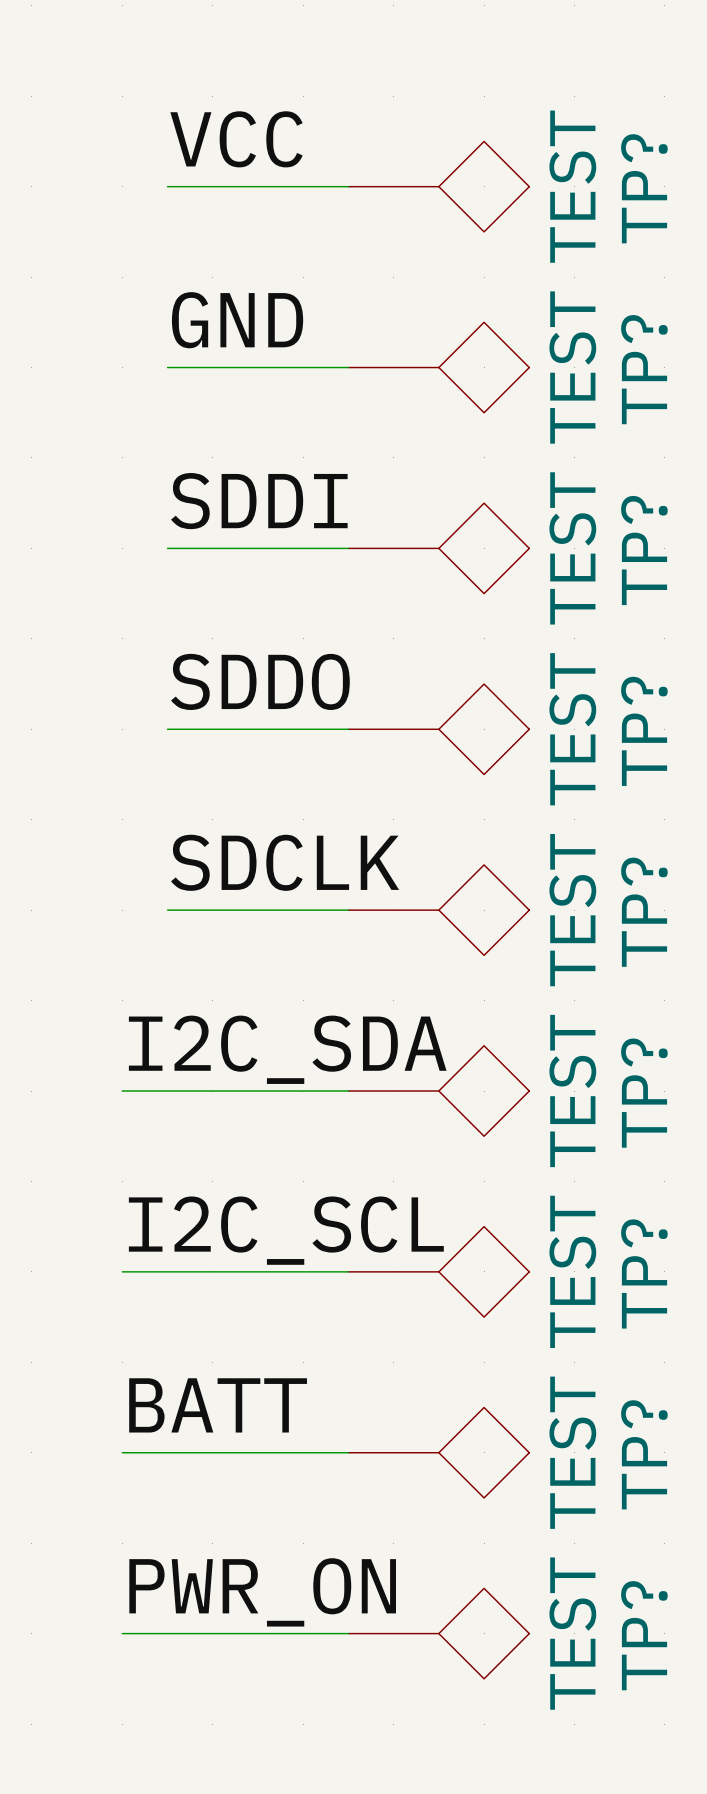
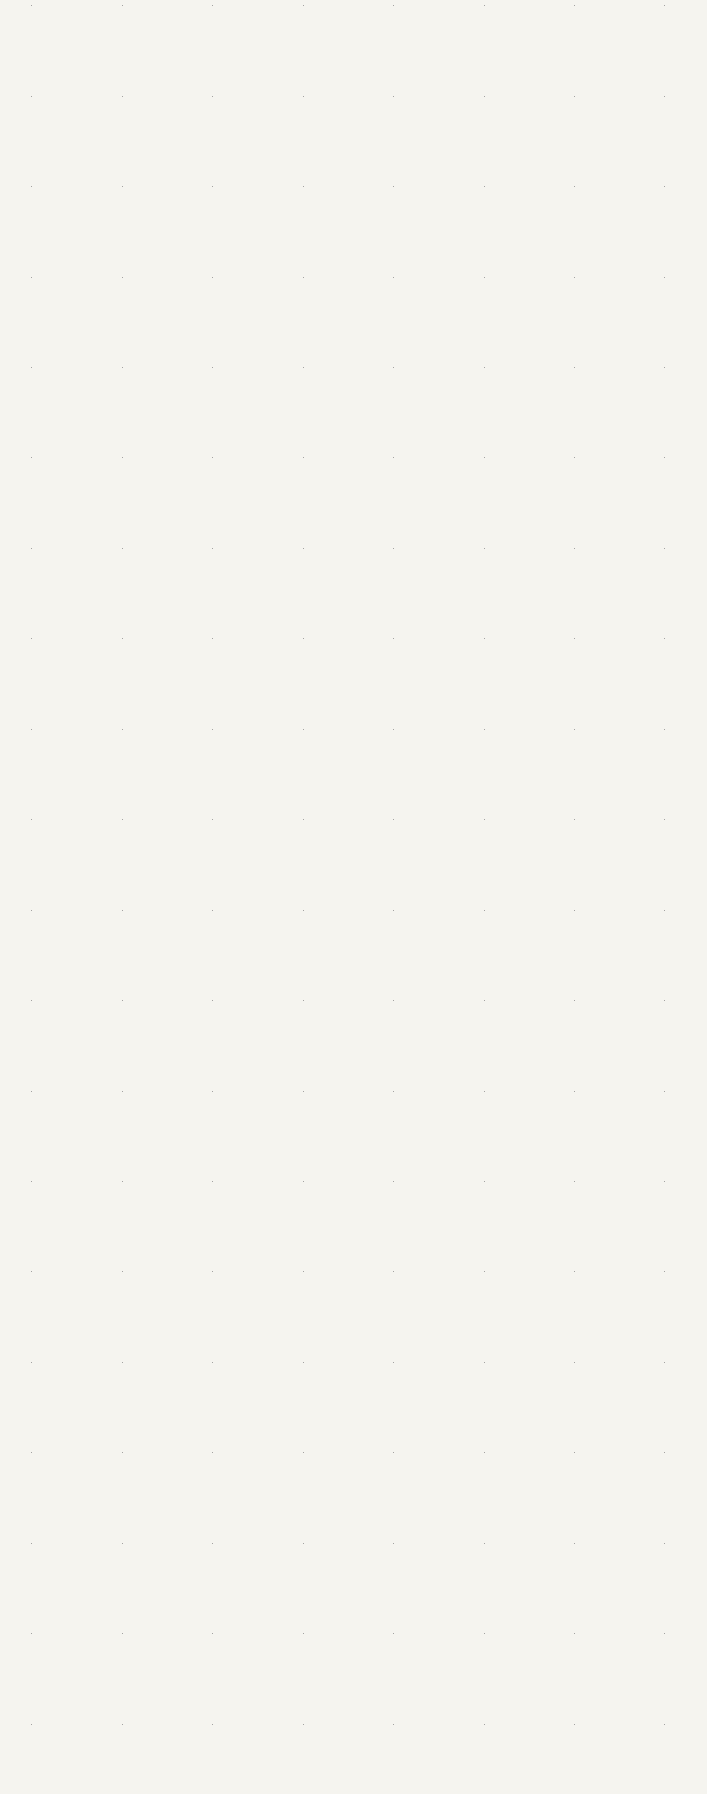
label: VCC (236, 139) -> none
wire: (167, 186) (348, 186) -> none
TP?: TEST (438, 186) -> none
label: GND (237, 320) -> none
wire: (167, 367) (348, 367) -> none
TP?: TEST (438, 367) -> none
label: SDDI (259, 501) -> none
wire: (167, 548) (348, 548) -> none
TP?: TEST (438, 548) -> none
label: SDDO (260, 681) -> none
wire: (167, 729) (348, 729) -> none
TP?: TEST (438, 729) -> none
label: SDCLK (285, 862) -> none
wire: (167, 910) (348, 910) -> none
TP?: TEST (438, 910) -> none
label: I2C_SDA (287, 1049) -> none
wire: (122, 1091) (348, 1091) -> none
TP?: TEST (438, 1091) -> none
label: I2C_SCL (286, 1230) -> none
wire: (122, 1271) (348, 1271) -> none
TP?: TEST (438, 1271) -> none
label: BATT (218, 1405) -> none
wire: (122, 1452) (348, 1452) -> none
TP?: TEST (438, 1452) -> none
label: PWR_ON (262, 1592) -> none
wire: (122, 1633) (348, 1633) -> none
TP?: TEST (438, 1633) -> none

